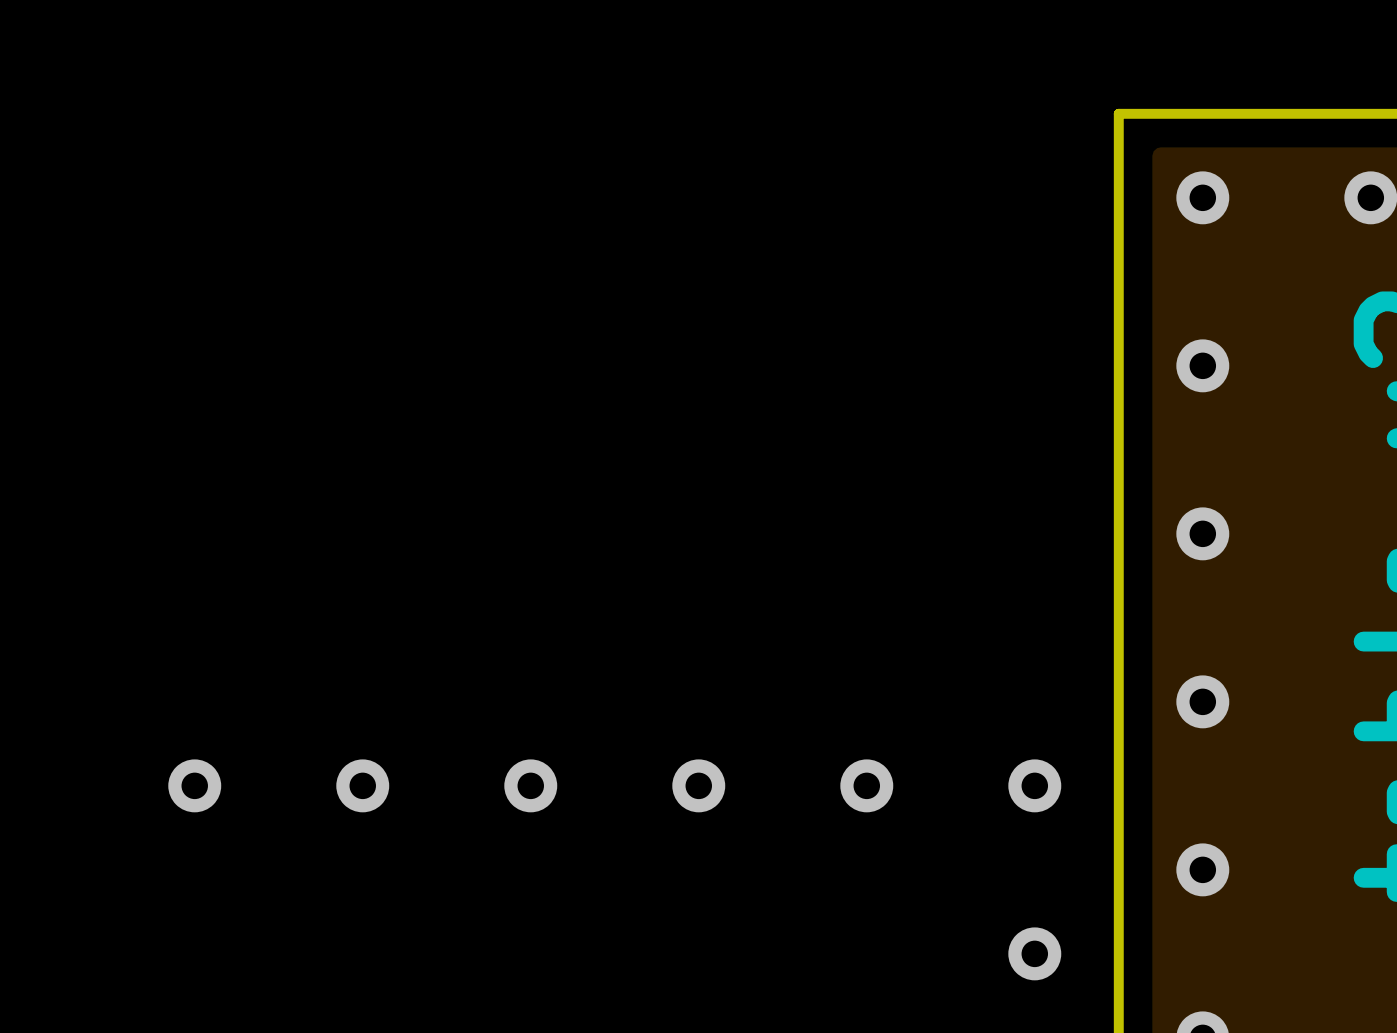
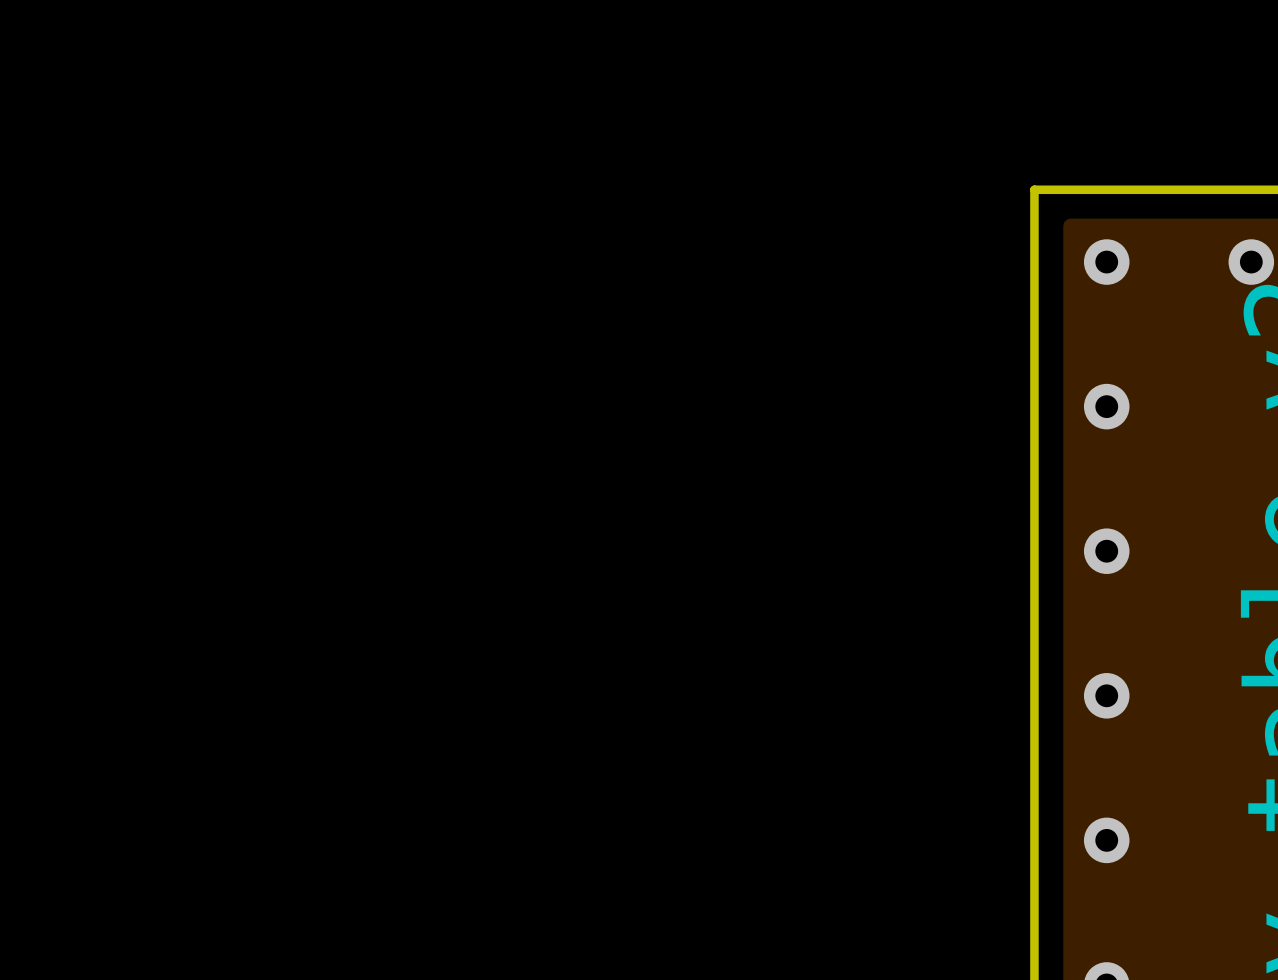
via: (194, 785) -> none
via: (362, 785) -> none
via: (530, 785) -> none
via: (698, 785) -> none
via: (866, 785) -> none
via: (1034, 785) -> none
via: (1034, 953) -> none

